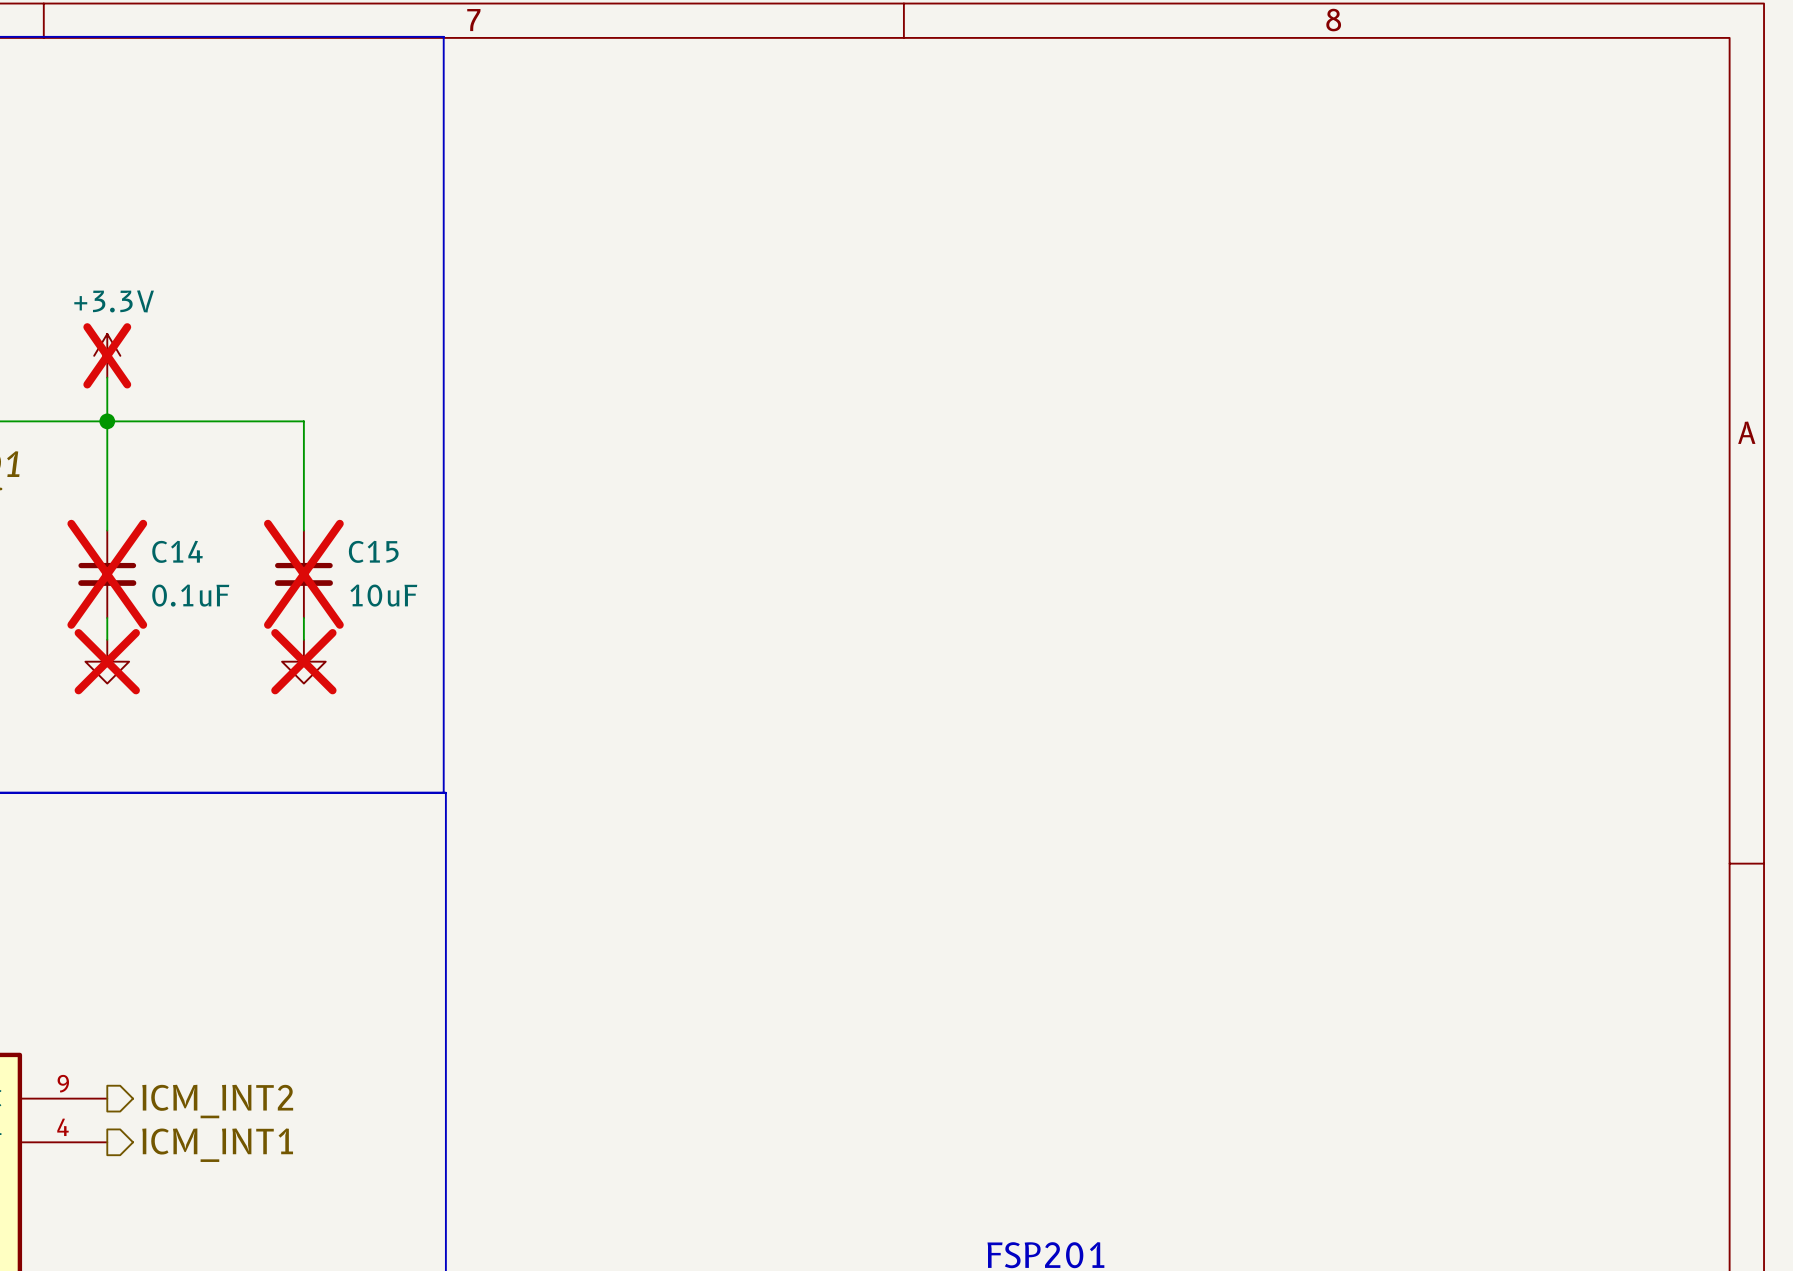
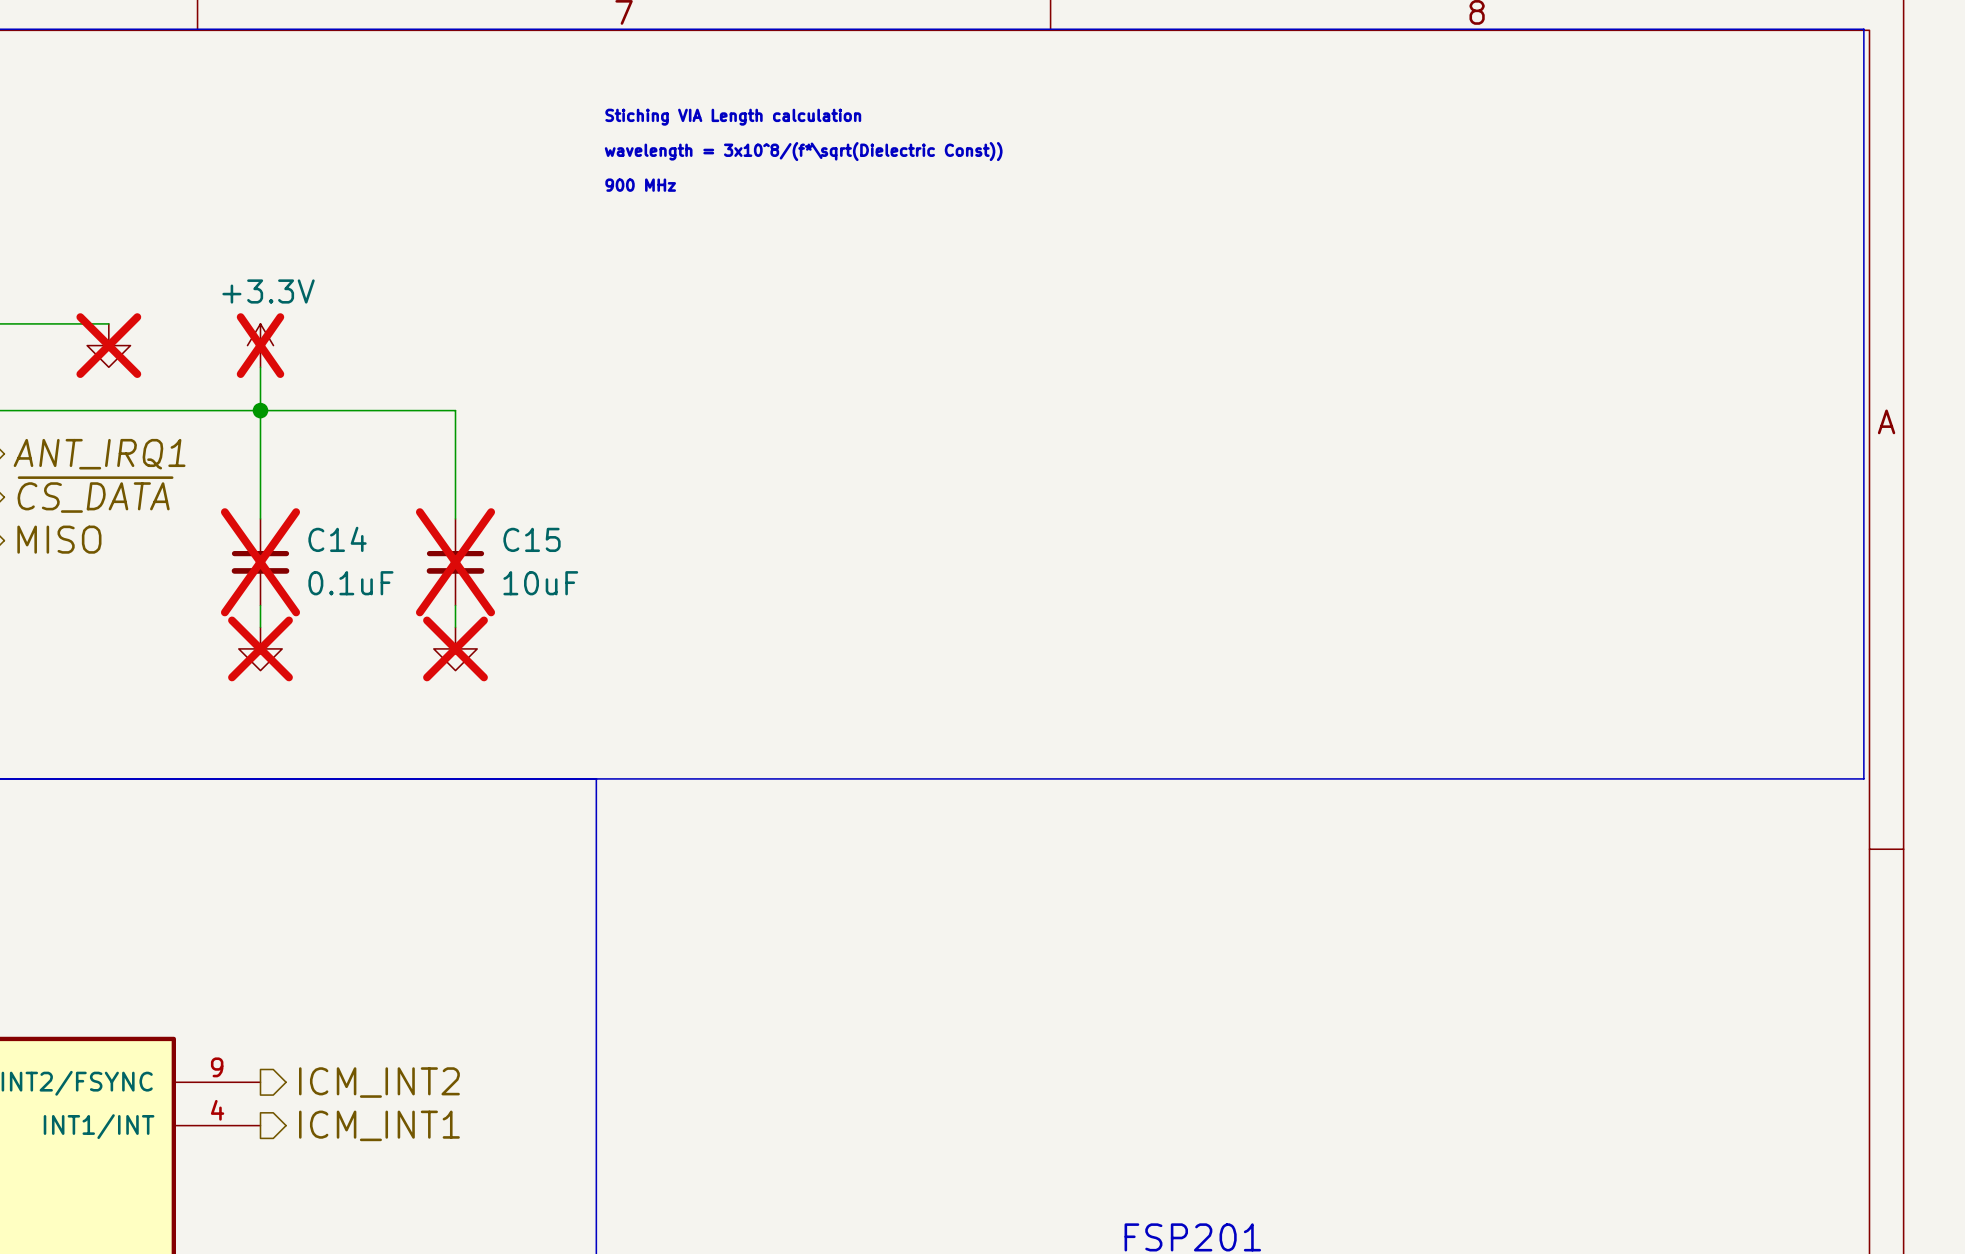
line: (443, 36) (443, 792) -> (594, 29) (1863, 29) (1863, 778) (596, 778)
text: none -> Stiching VIA Length calculation (733, 117)
text: none -> wavelength = 3x10^8/(f*\sqrt(Dielectric Const)) (803, 151)
text: none -> 900 MHz (640, 185)

